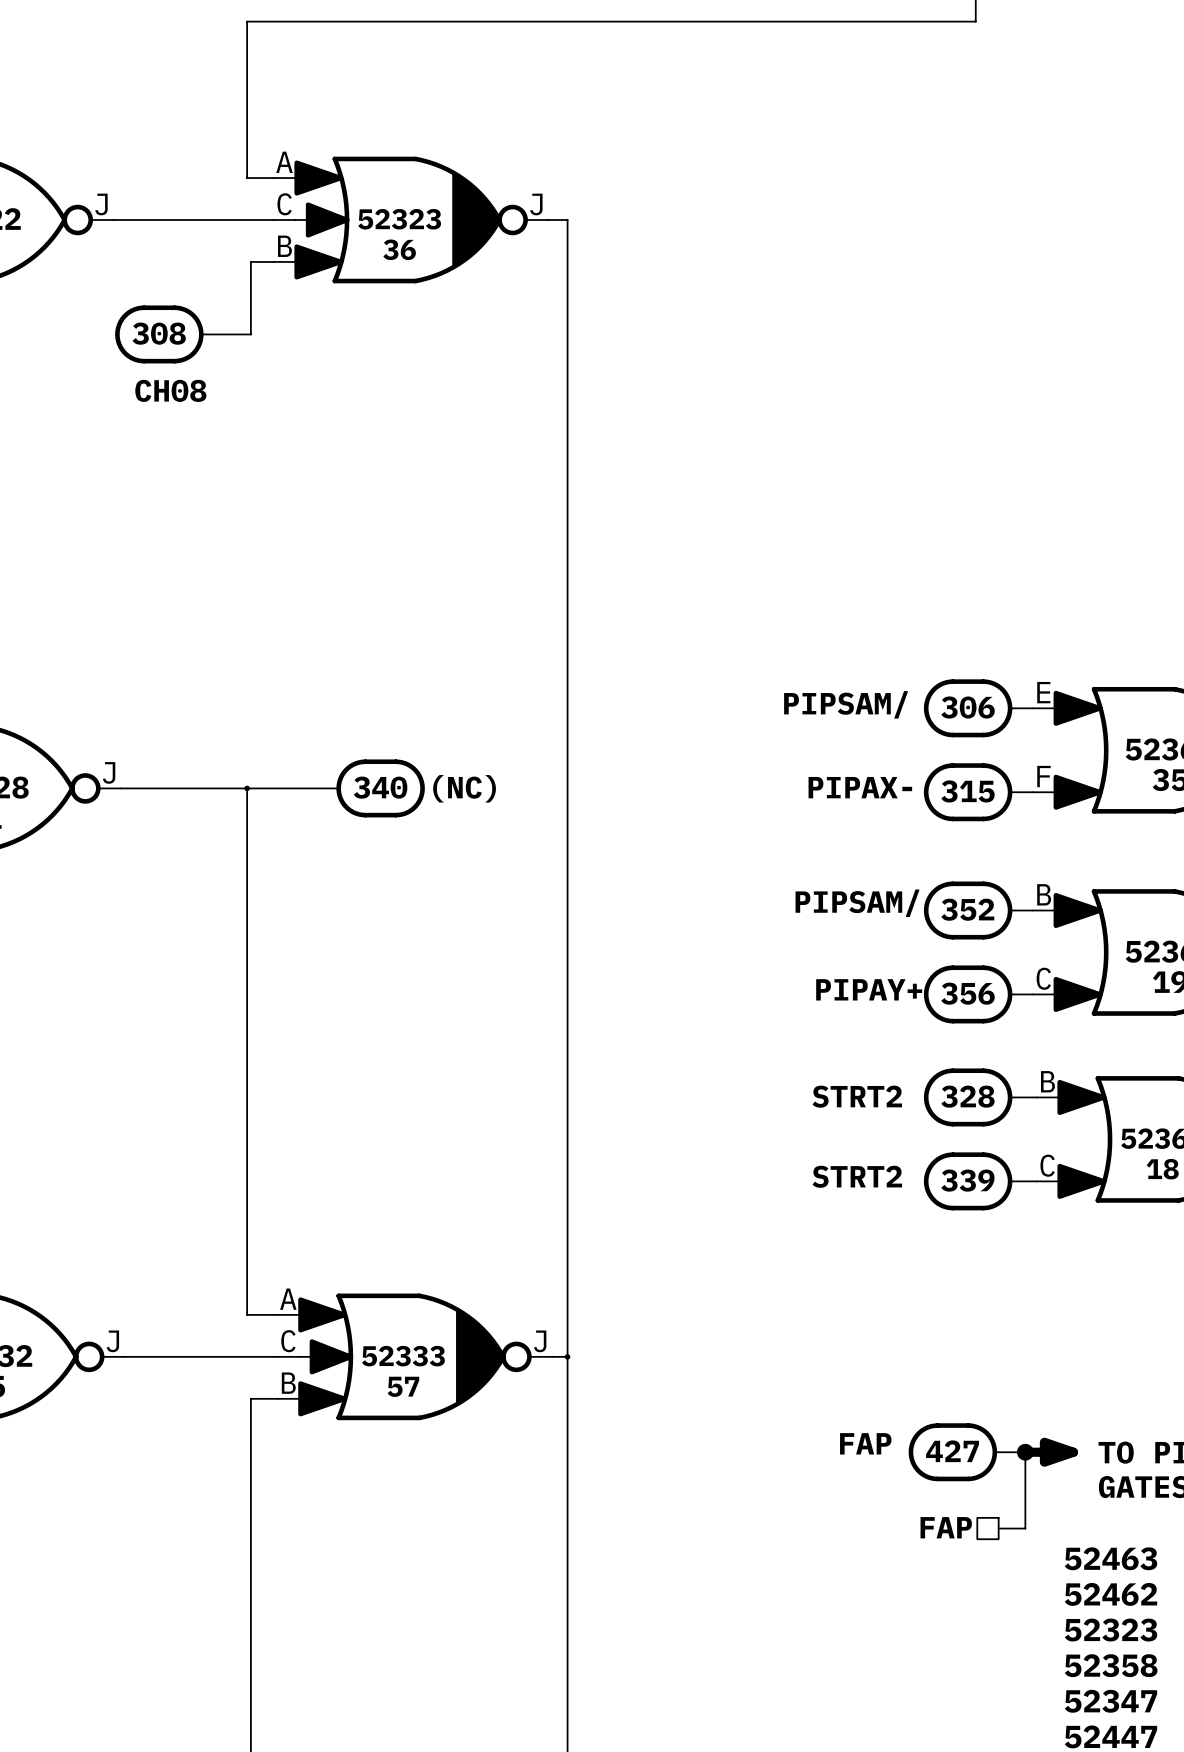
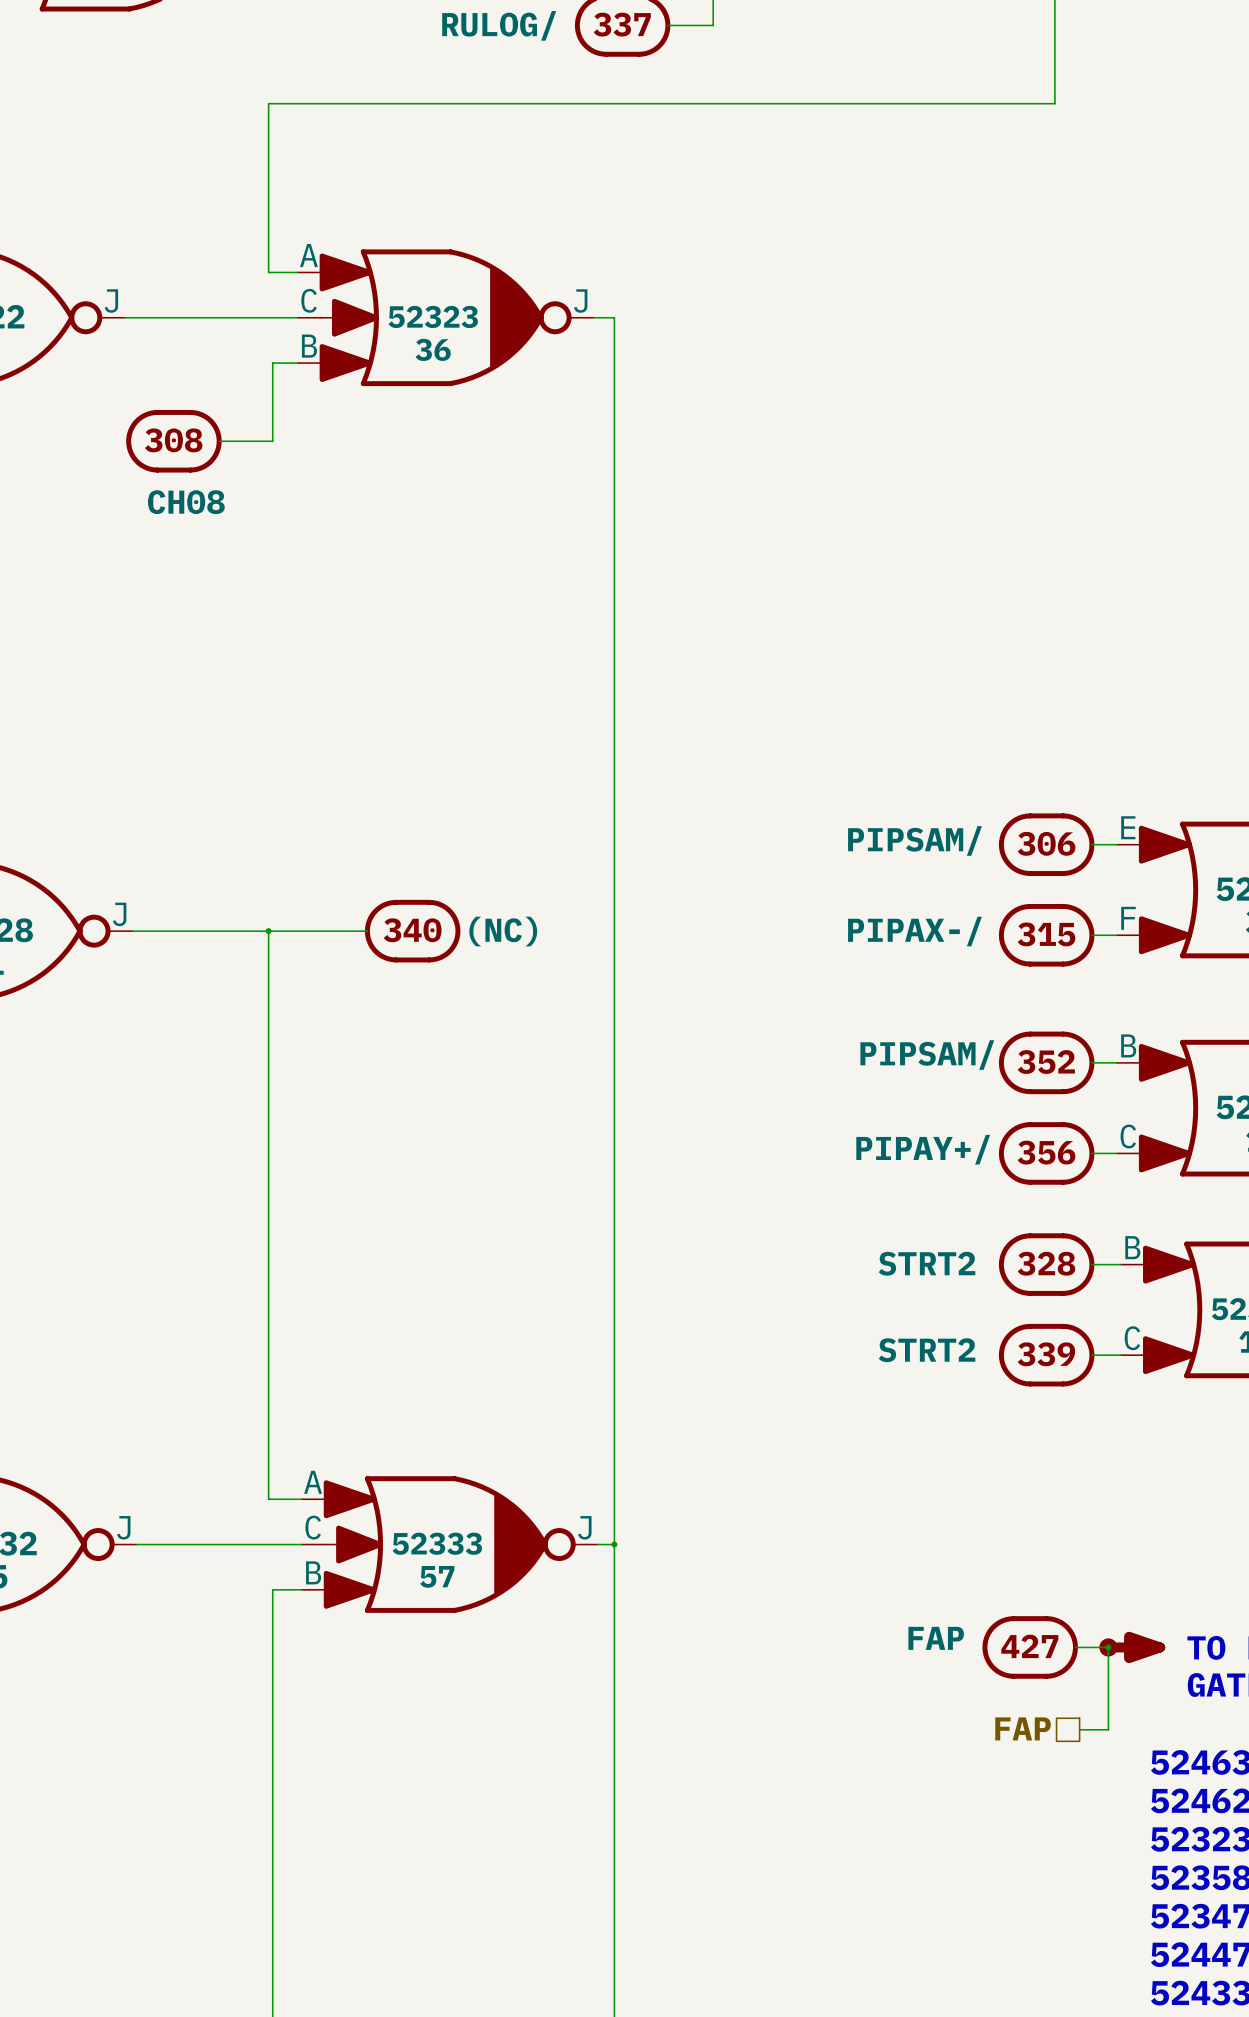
part text: PIPAX- (860, 787) -> PIPAX-/ (914, 931)
part text: PIPAY+ (869, 989) -> PIPAY+/ (923, 1149)

